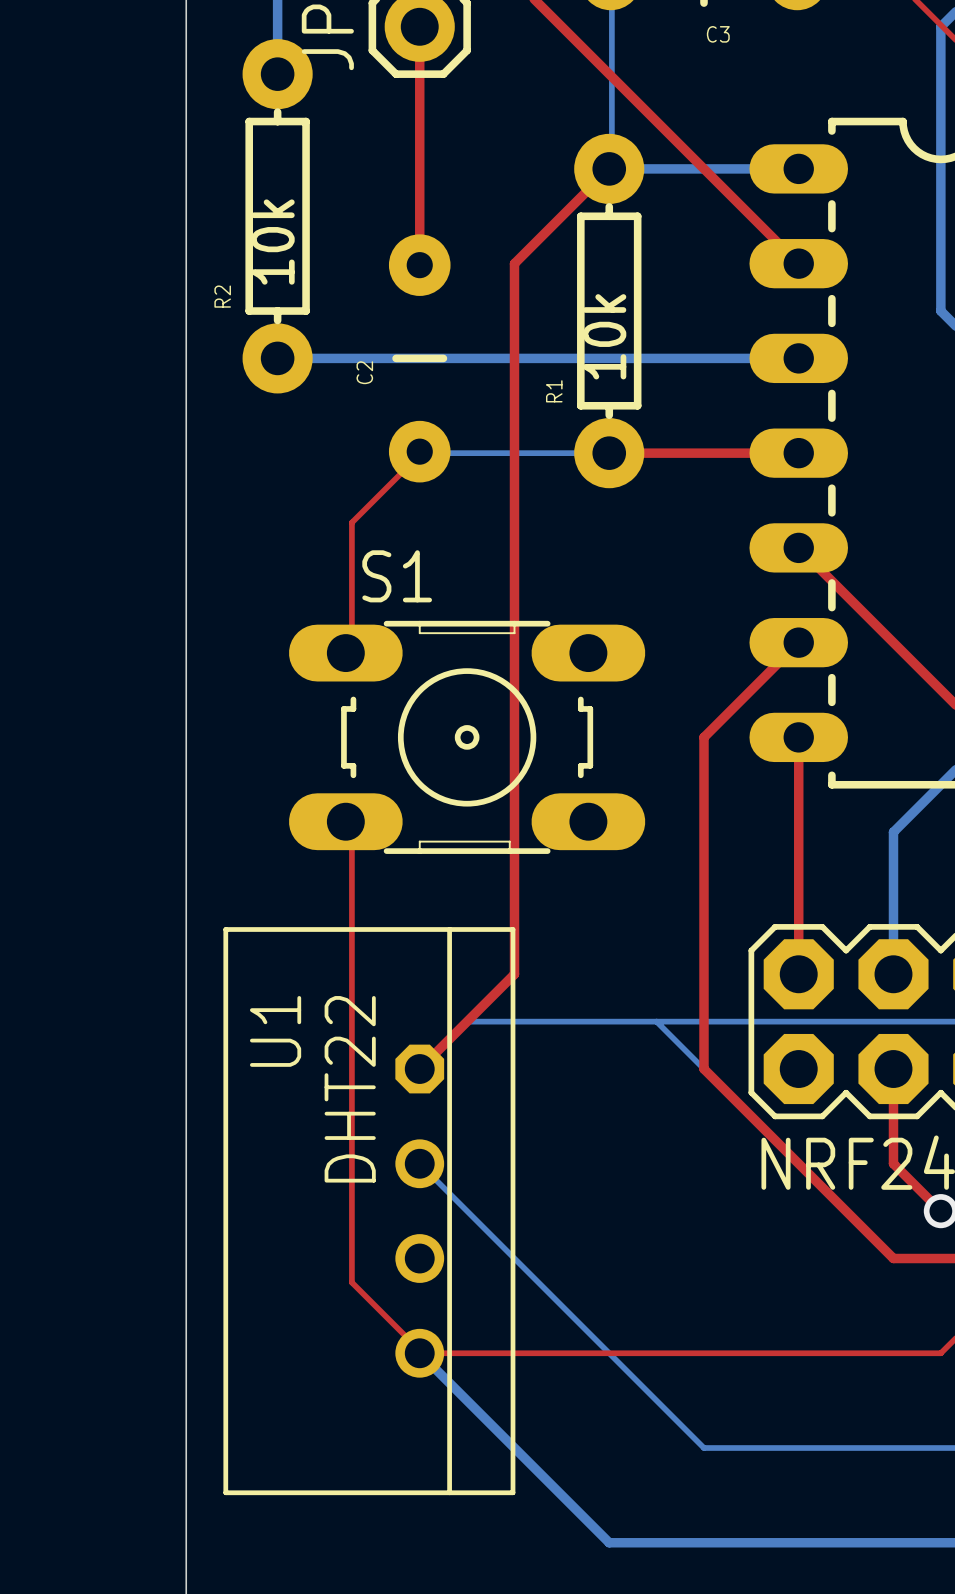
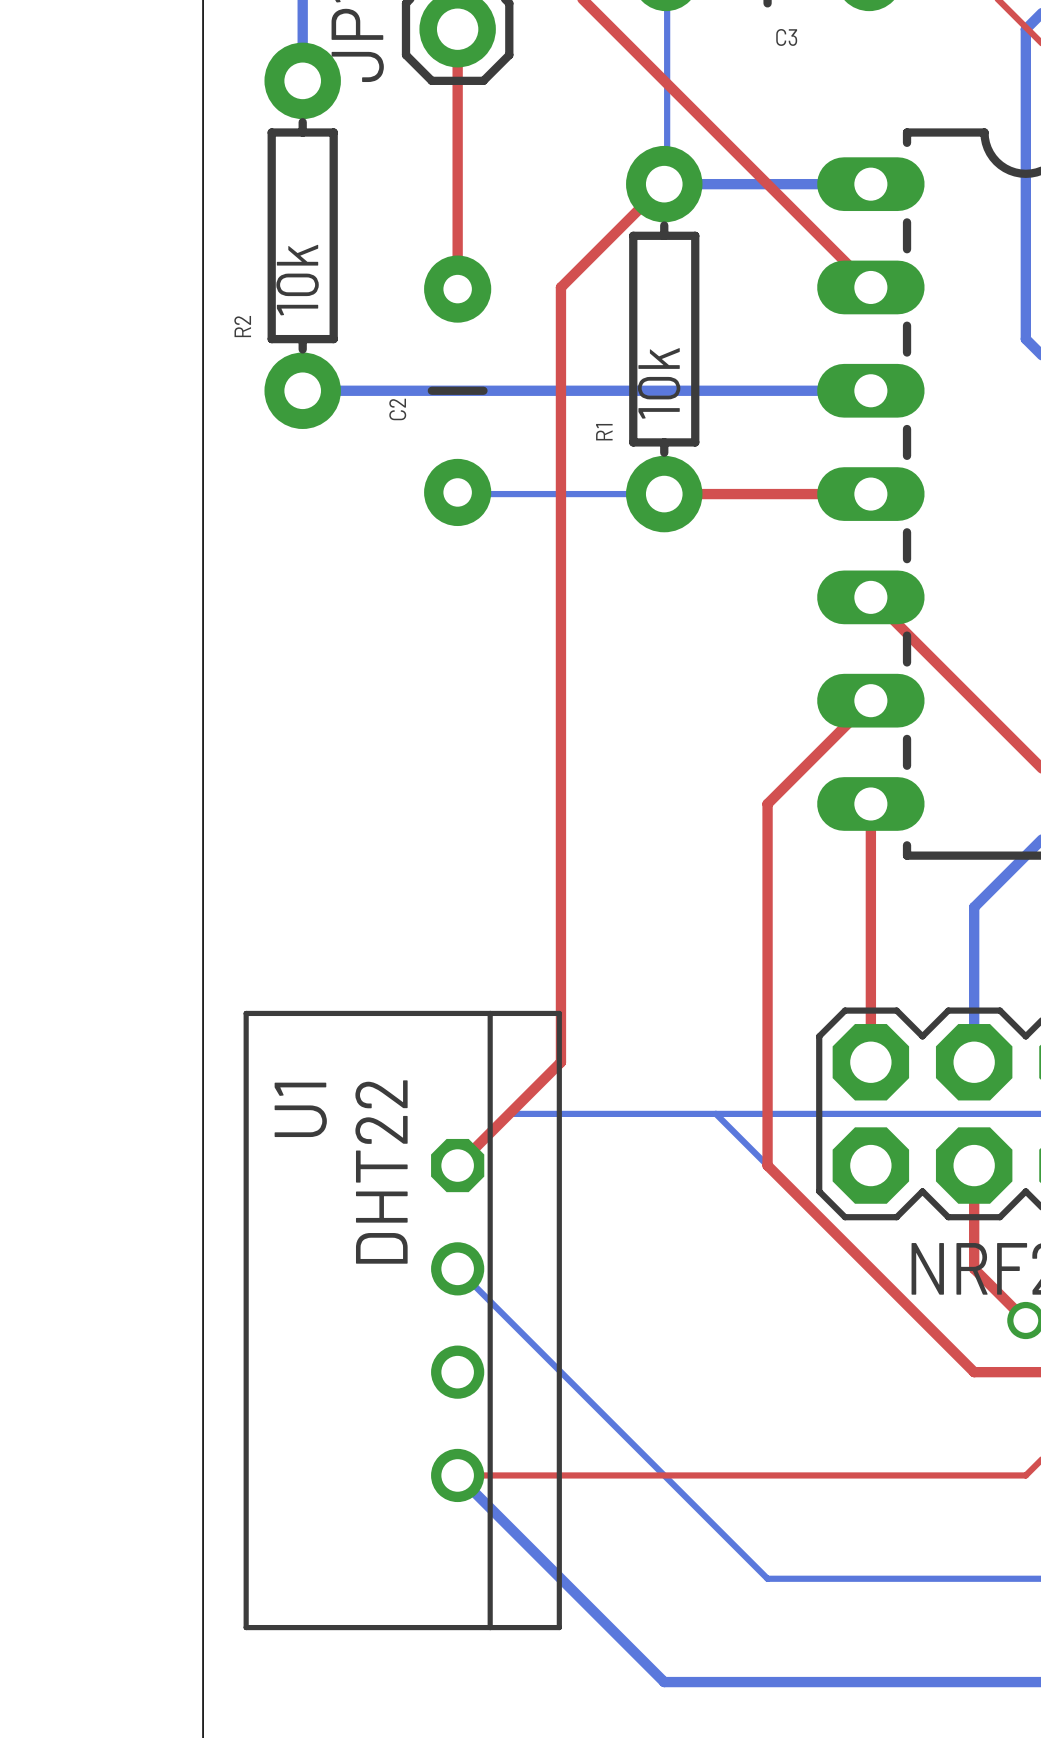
top track: (419, 451) (418, 455) (351, 522) (351, 649) (345, 653) -> none
S1: (467, 737) -> none
top track: (345, 821) (351, 822) (351, 1282) (418, 1349) (419, 1353) -> none

